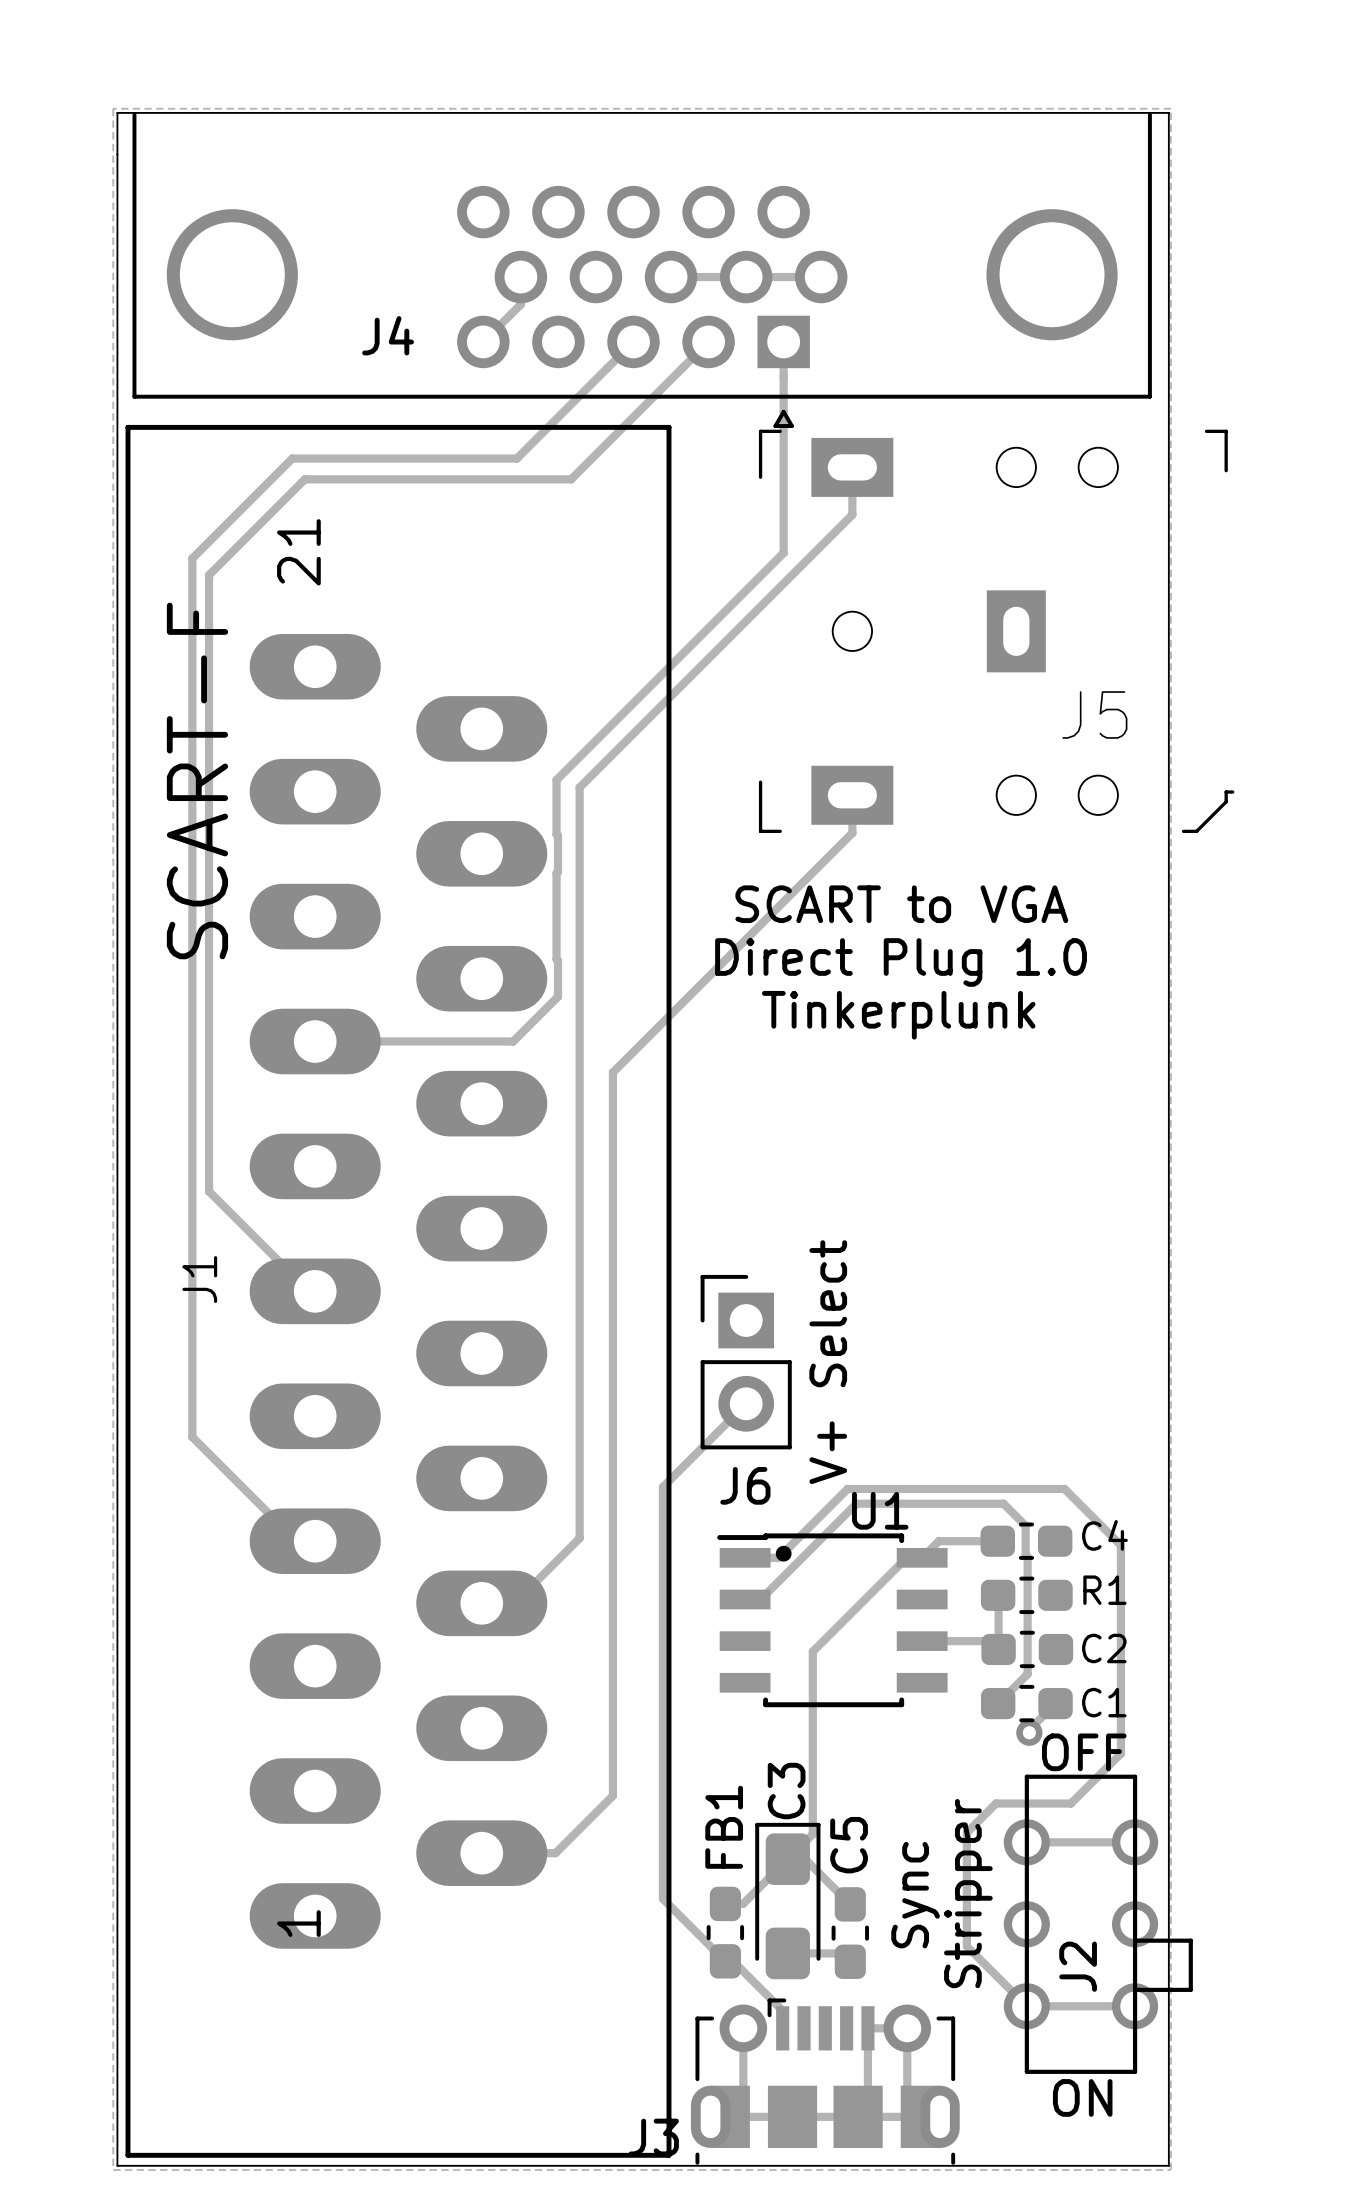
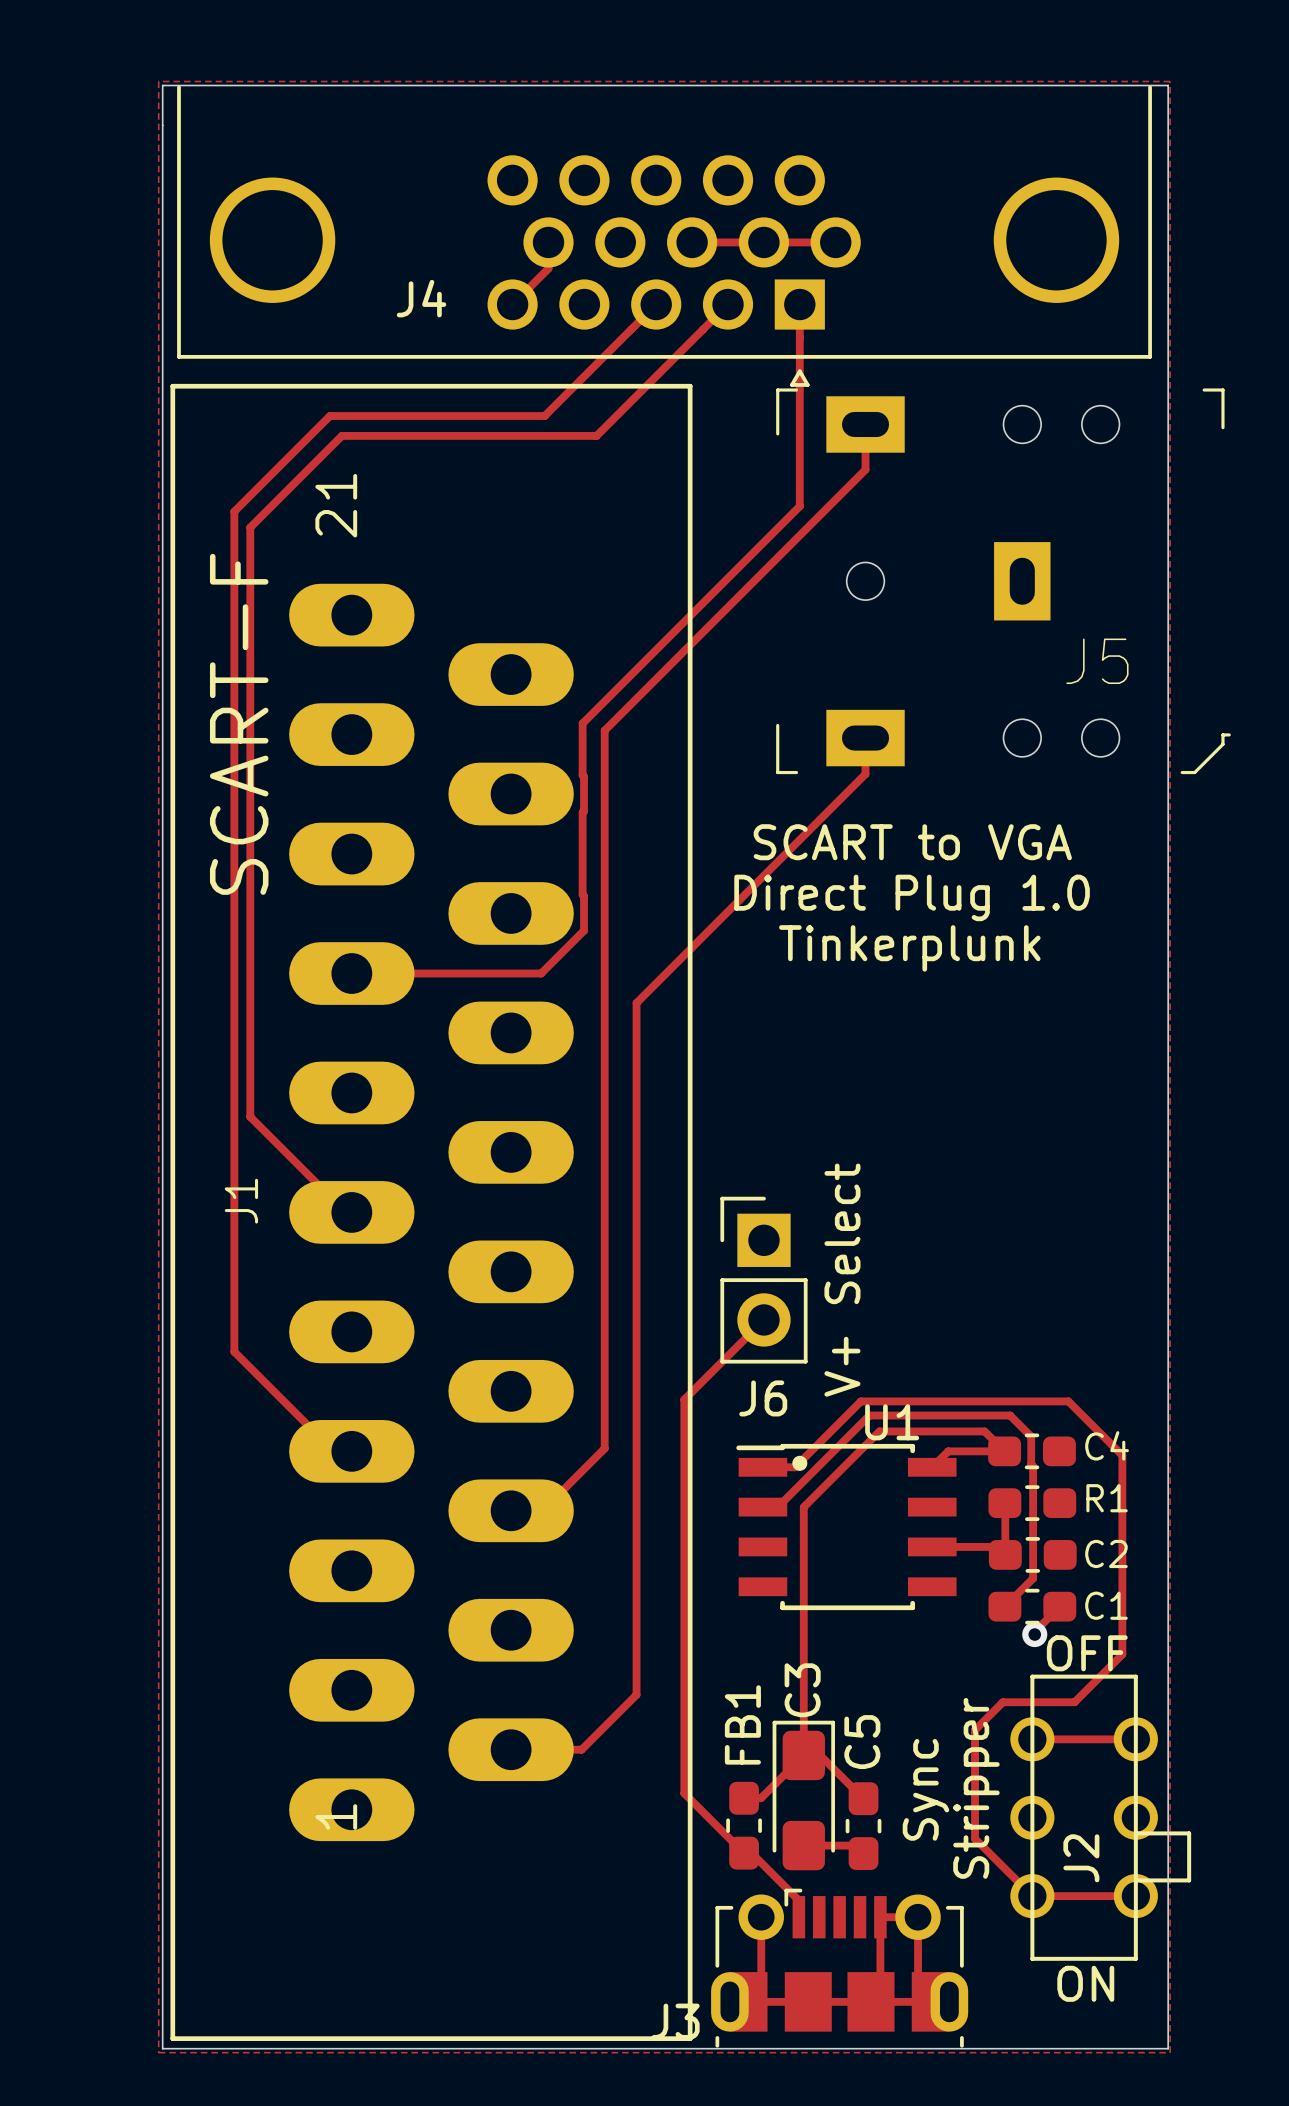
track: (922, 1557) (906, 1557) (812, 1651) (812, 1834) (787, 1859) -> (1004, 1451) (984, 1431) (879, 1431) (803, 1507) (803, 1755)

